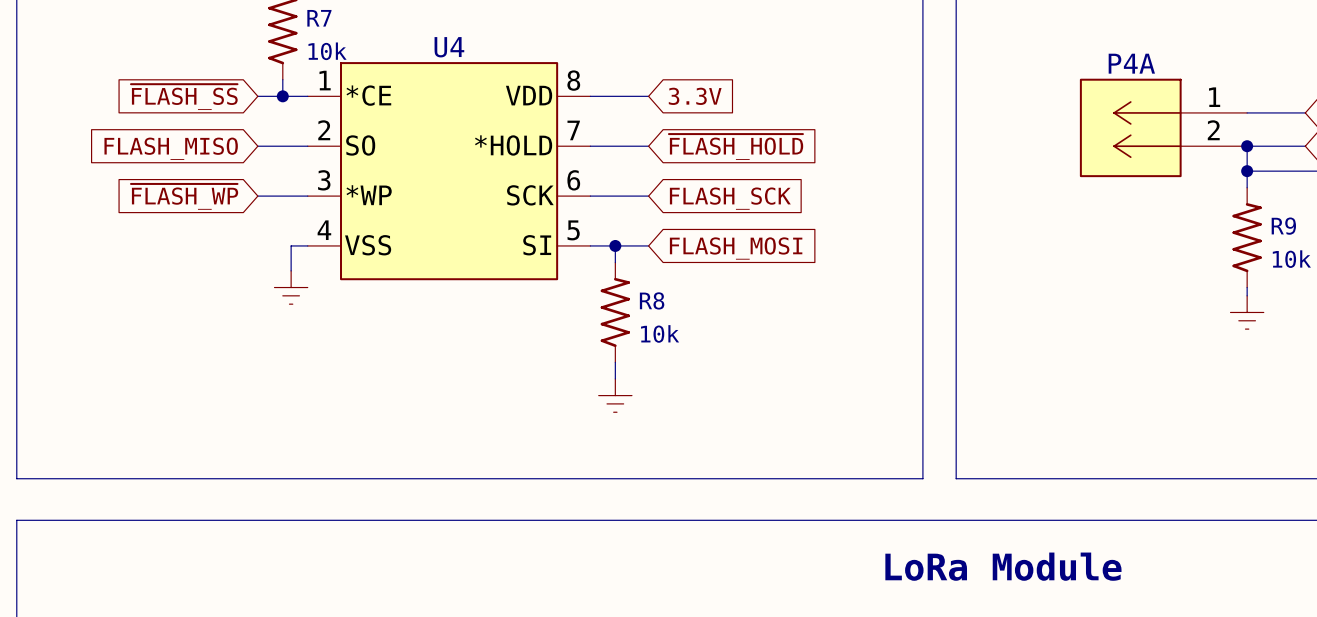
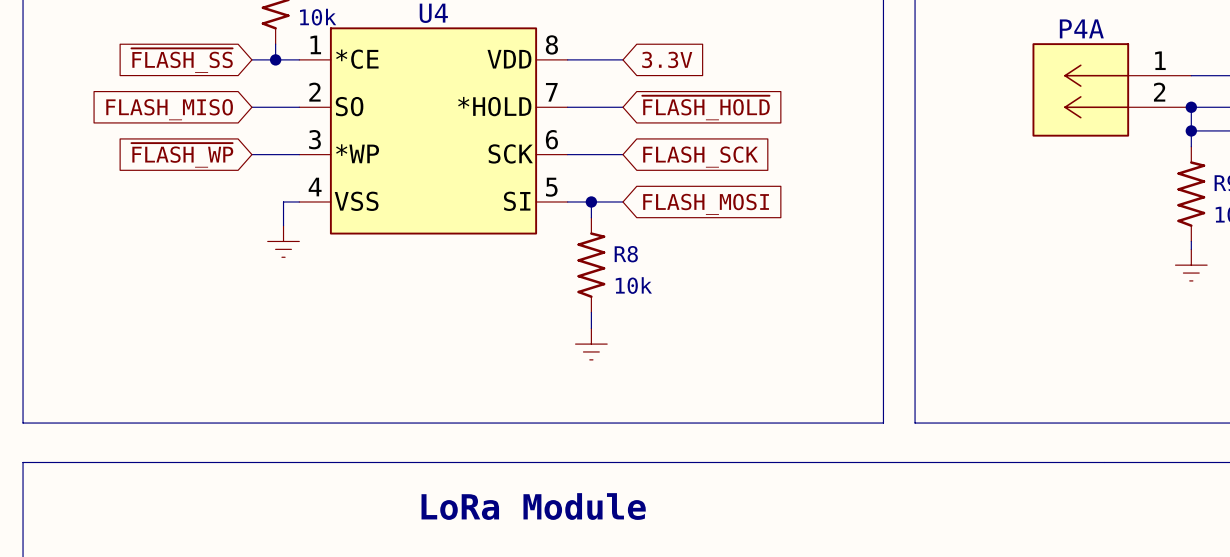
text: none -> LoRa Module (533, 506)
text: LoRa Module (1003, 566) -> none

